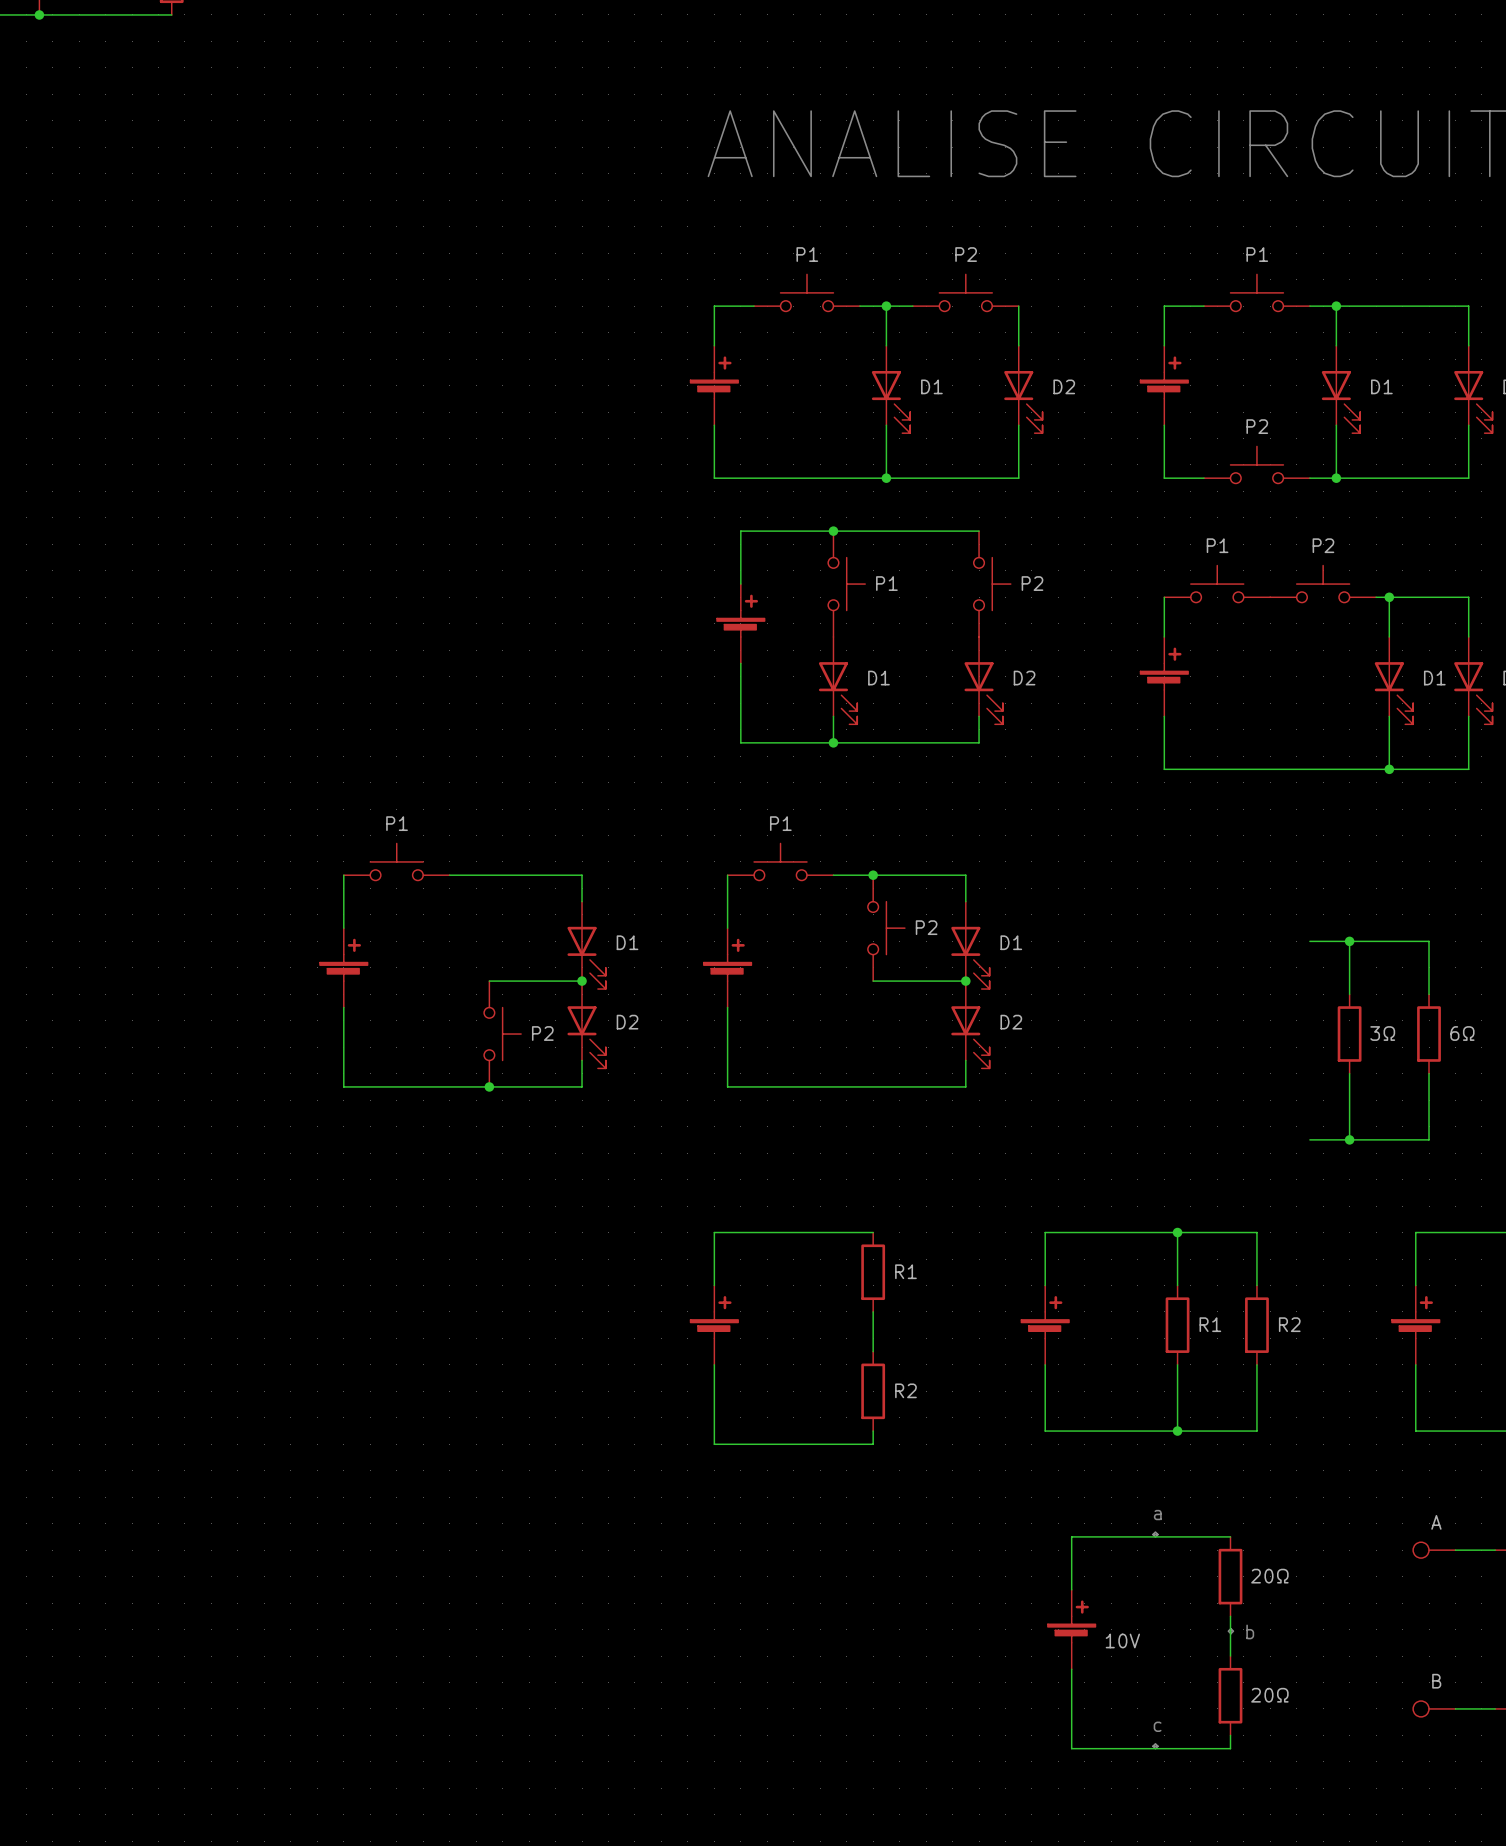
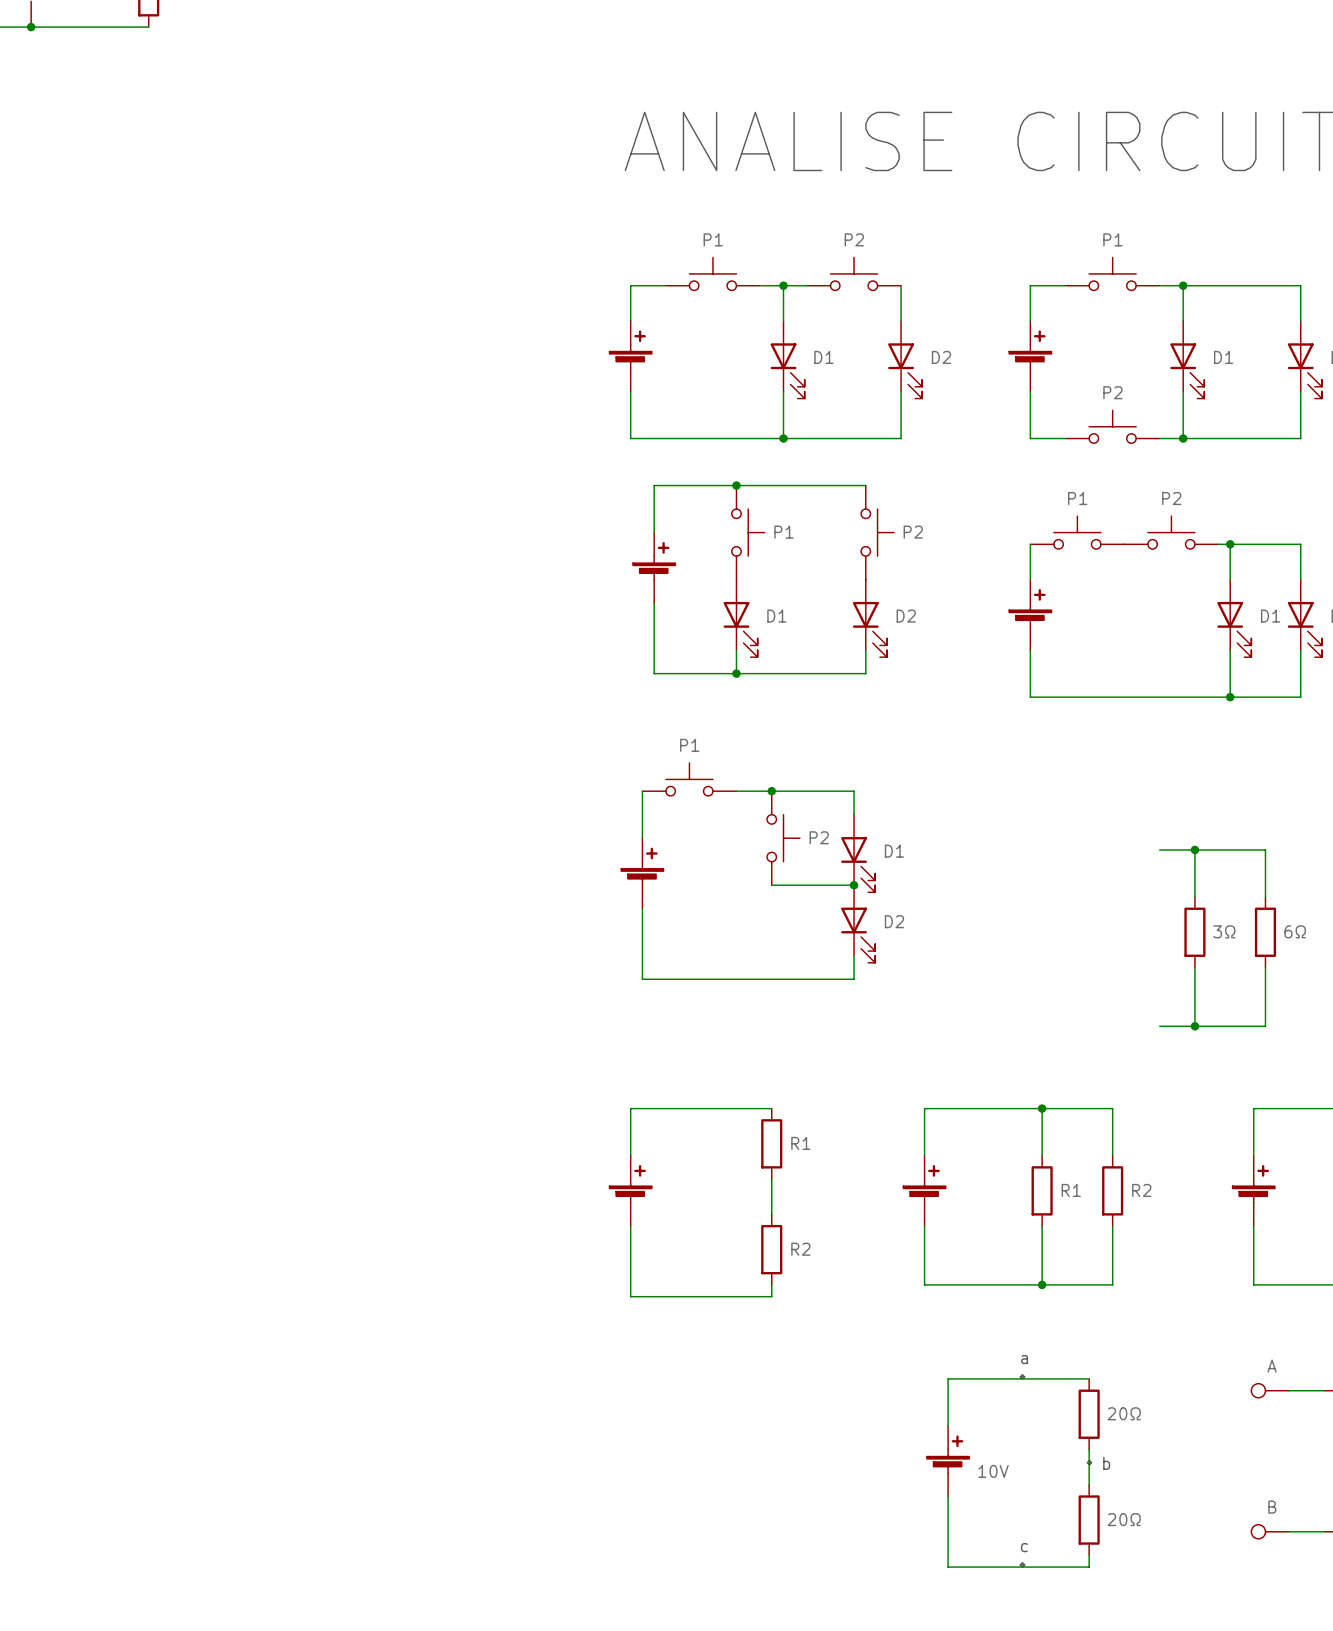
P1: (396, 861) -> none
wire: (343, 875) (343, 928) -> none
wire: (449, 875) (582, 875) (582, 901) -> none
D1: (586, 945) -> none
part: (343, 967) -> none
wire: (489, 981) (582, 981) -> none
junction: (582, 981) -> none
wire: (343, 1007) (343, 1086) (582, 1086) (582, 1060) -> none
D2: (586, 1024) -> none
P2: (502, 1034) -> none
junction: (489, 1086) -> none

